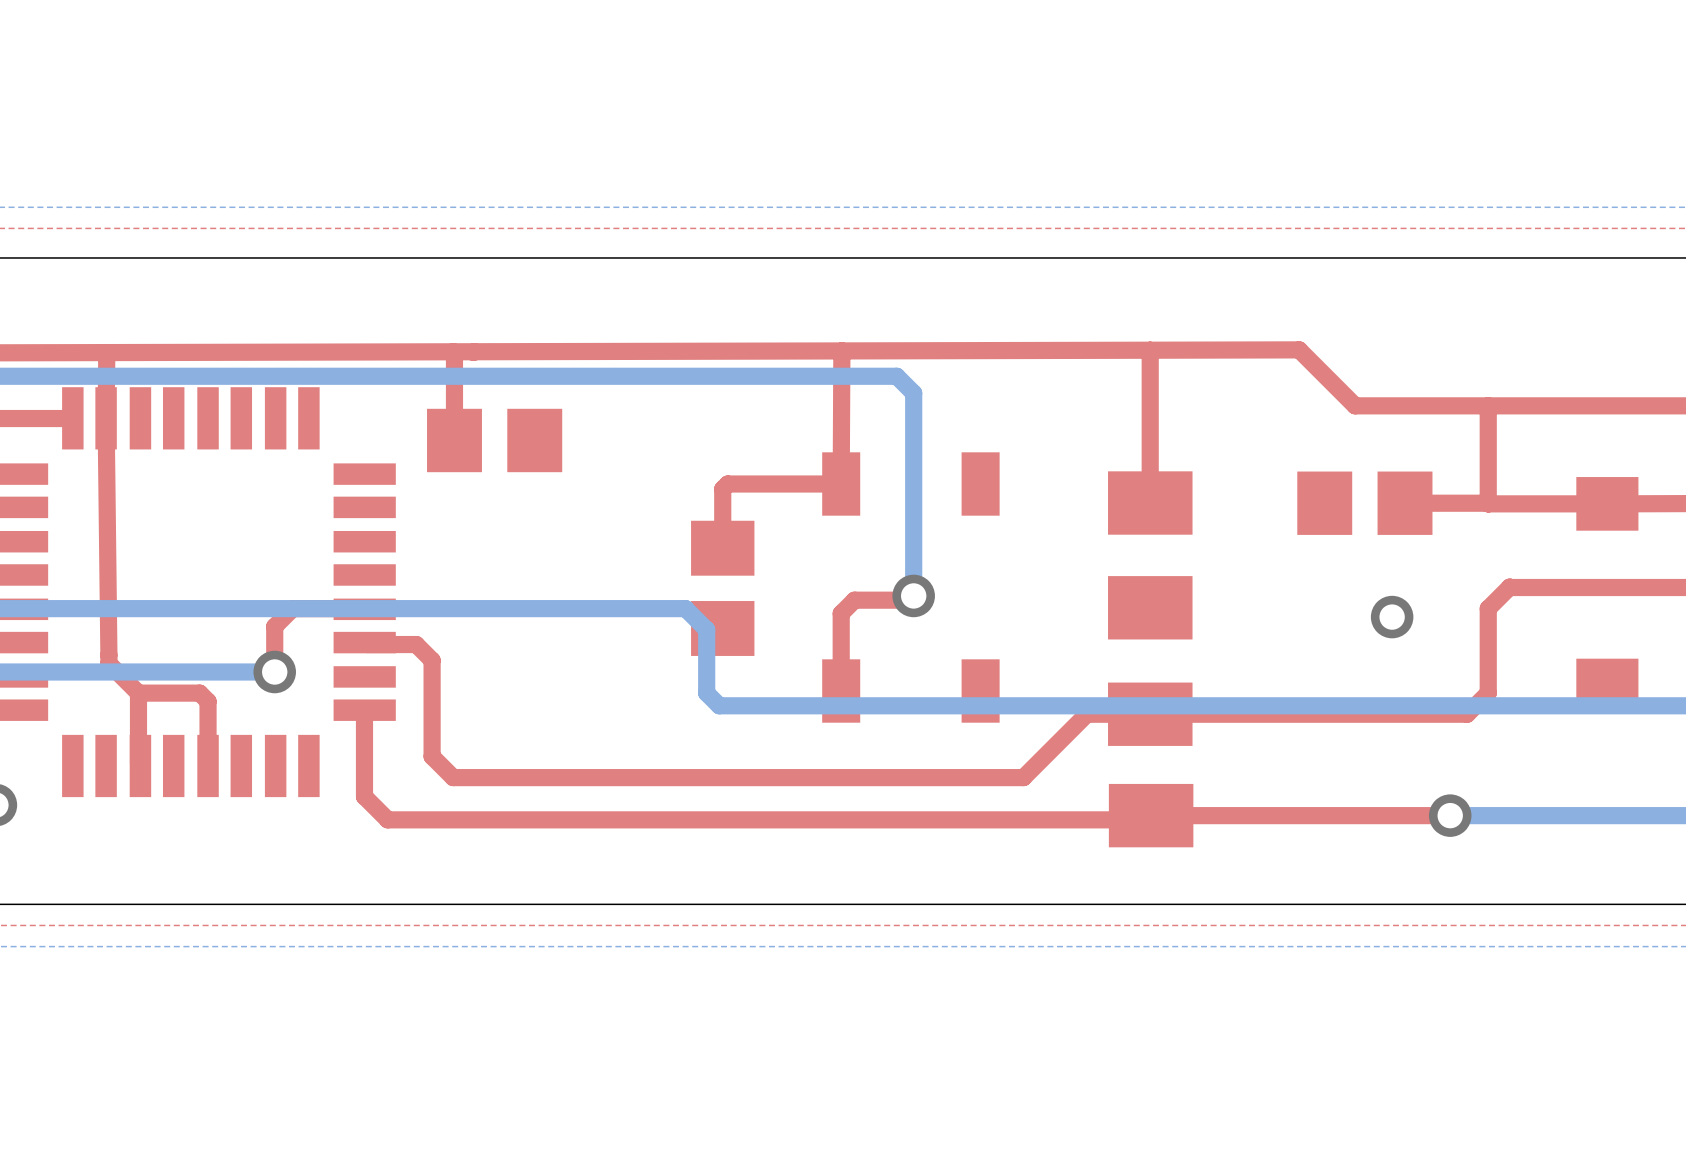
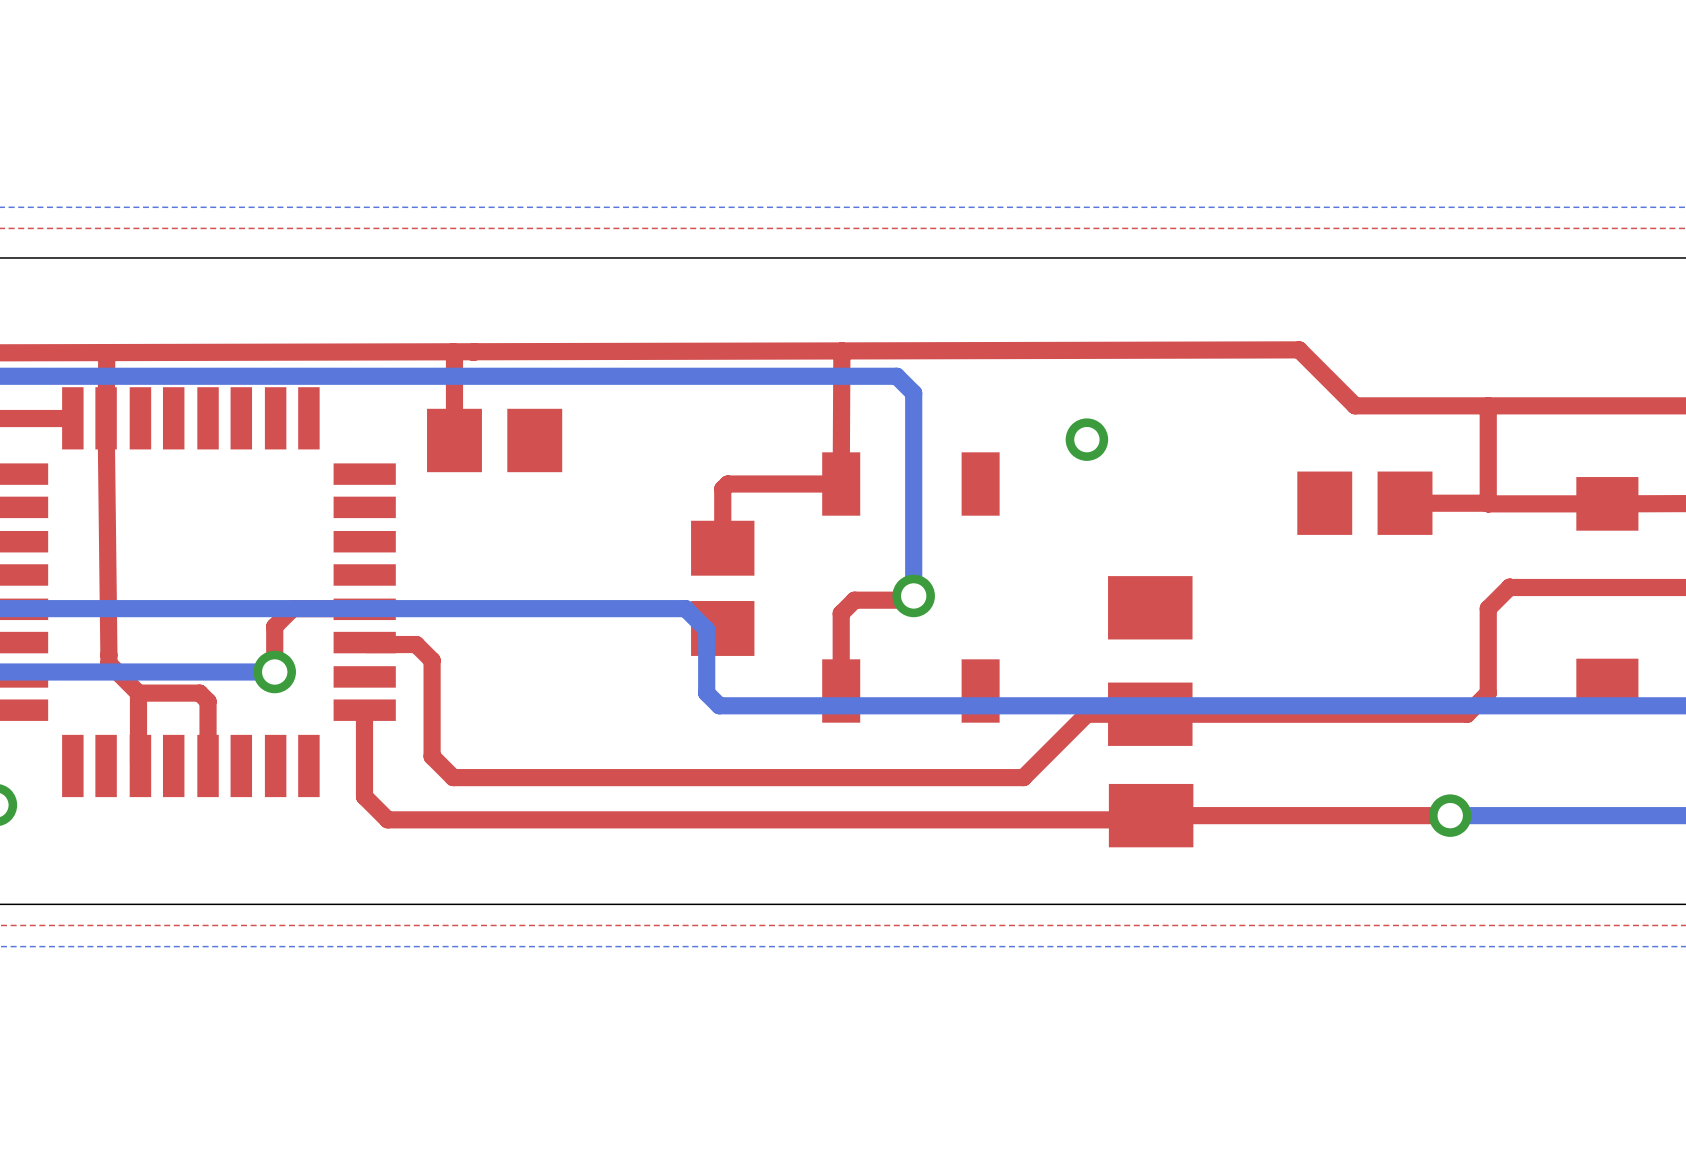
top track: (1150, 350) (1150, 503) -> none
via: none -> (1086, 439)
part: (1150, 503) -> none
via: (1392, 617) -> none

